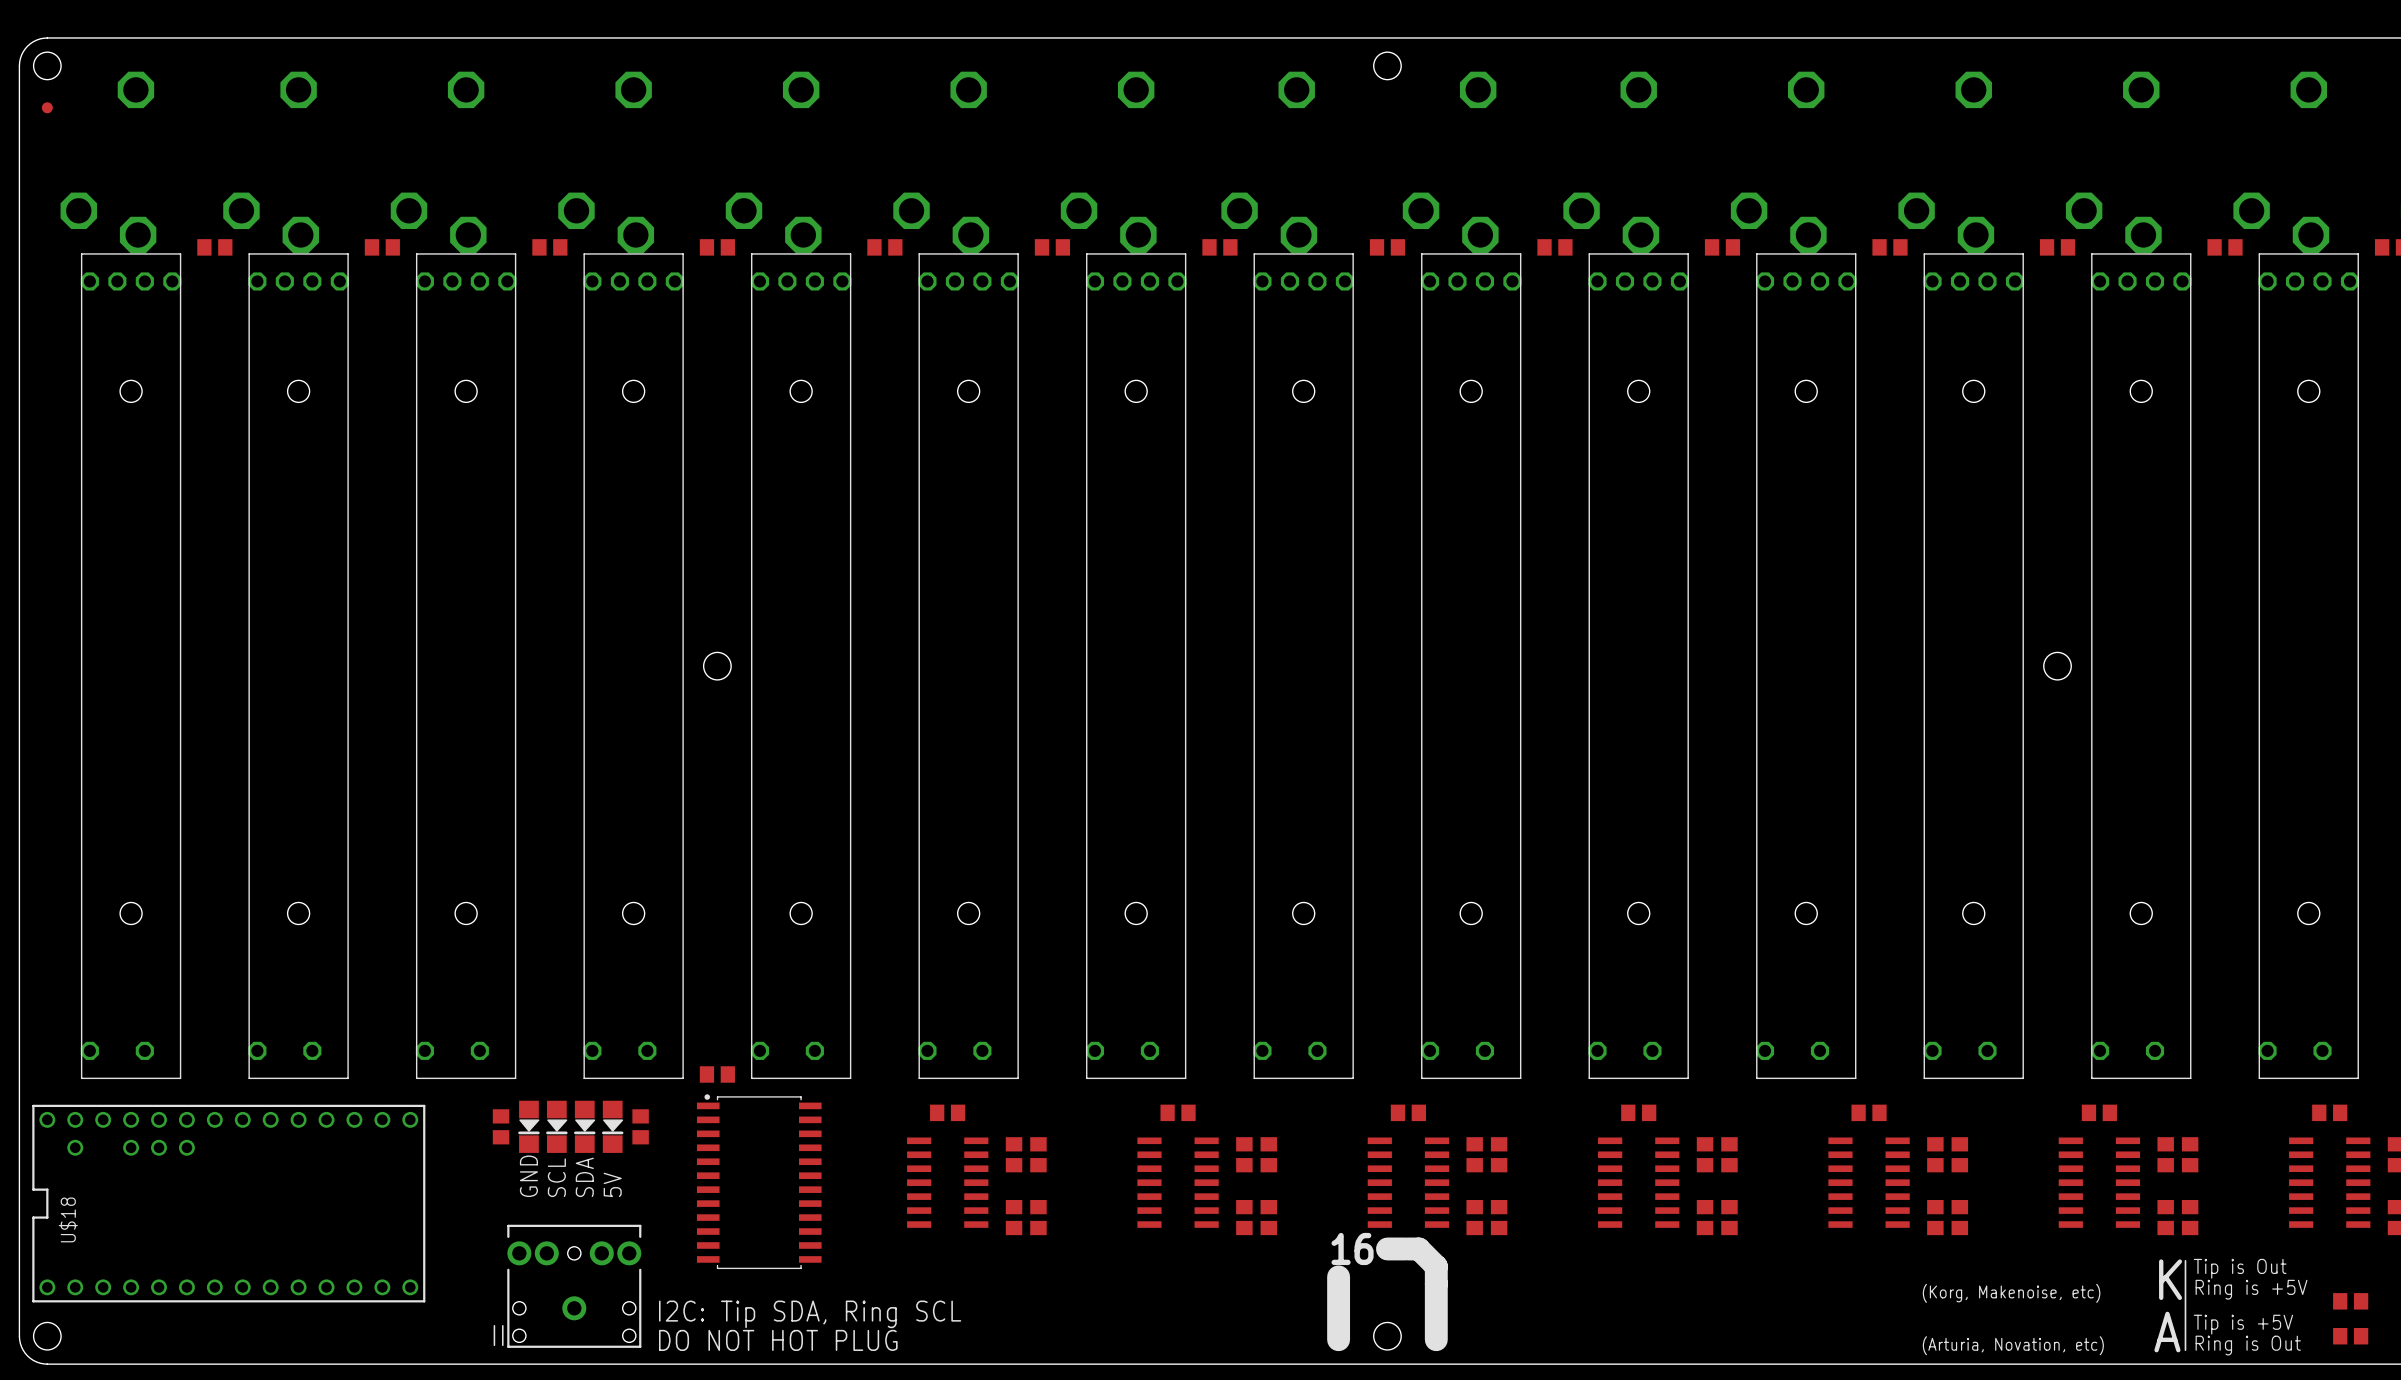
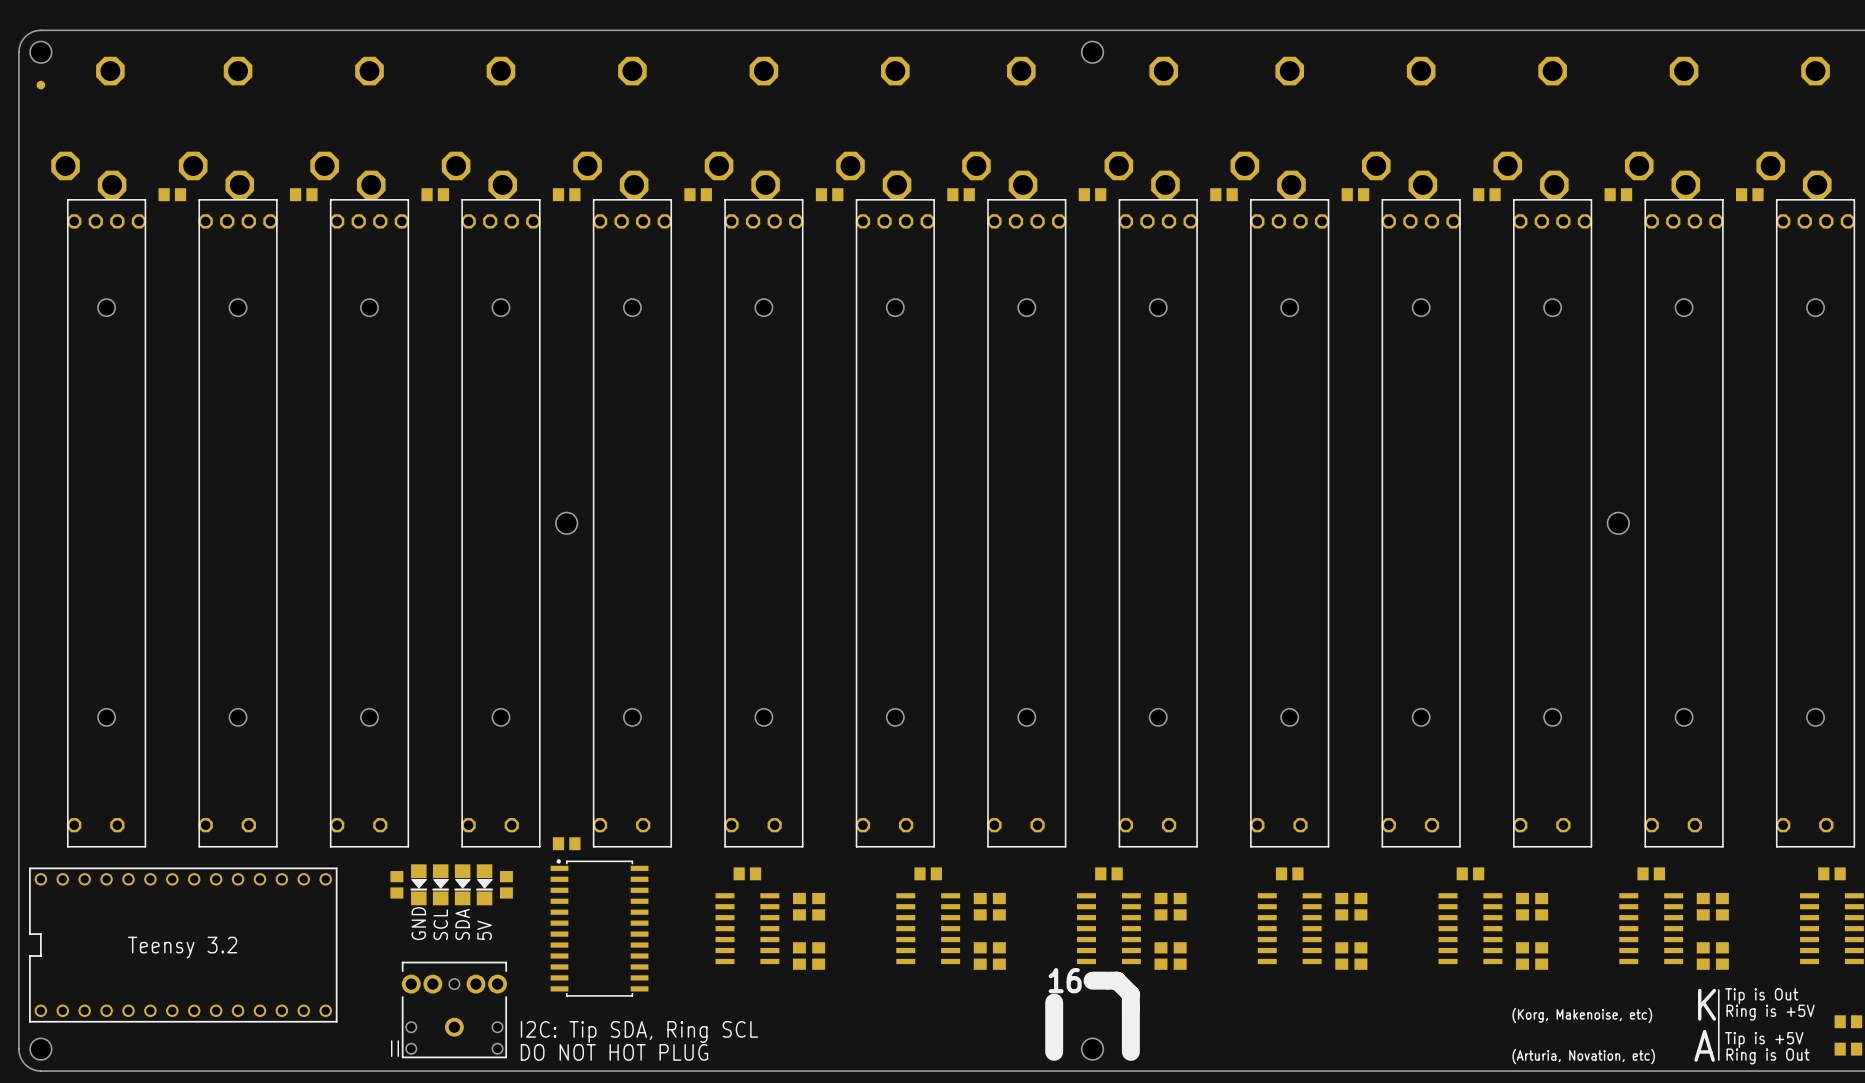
U$18: (228, 1203) -> none
text: none -> Teensy 3.2 (182, 947)

